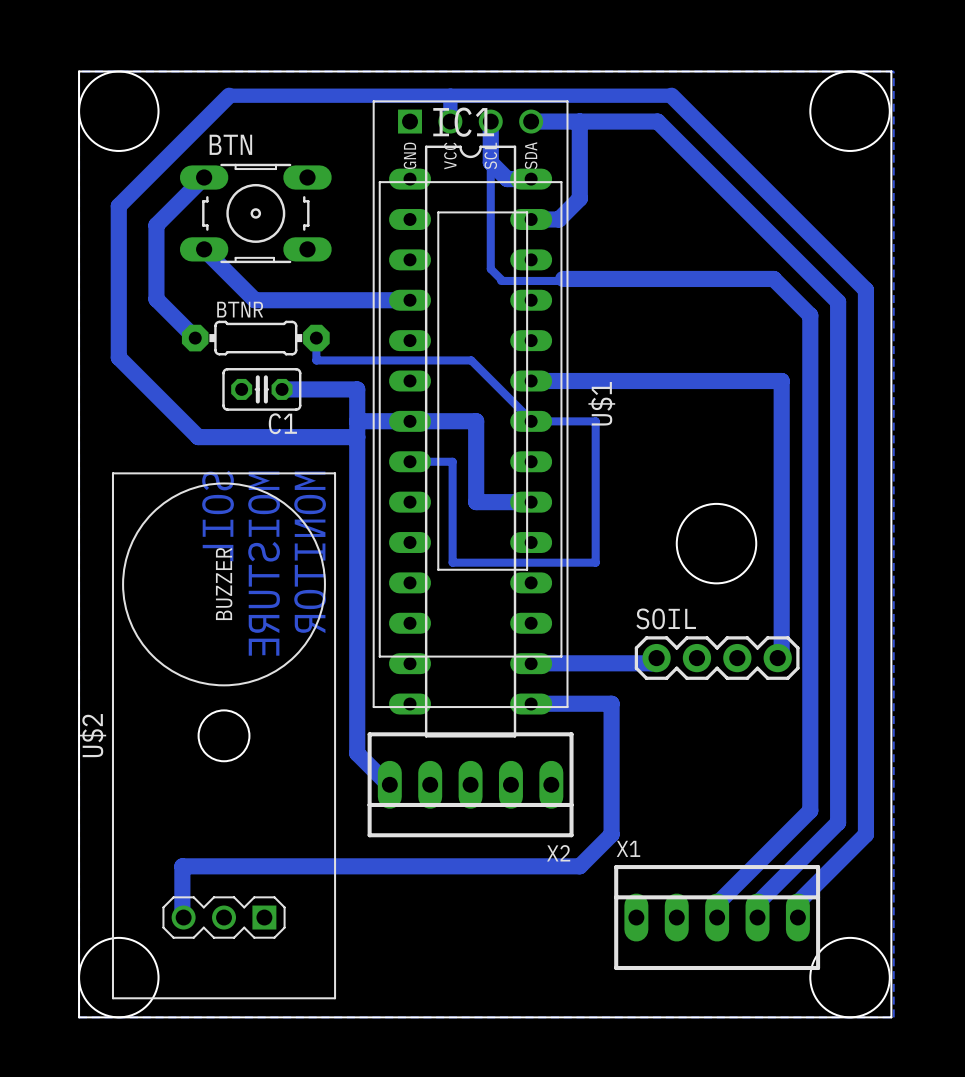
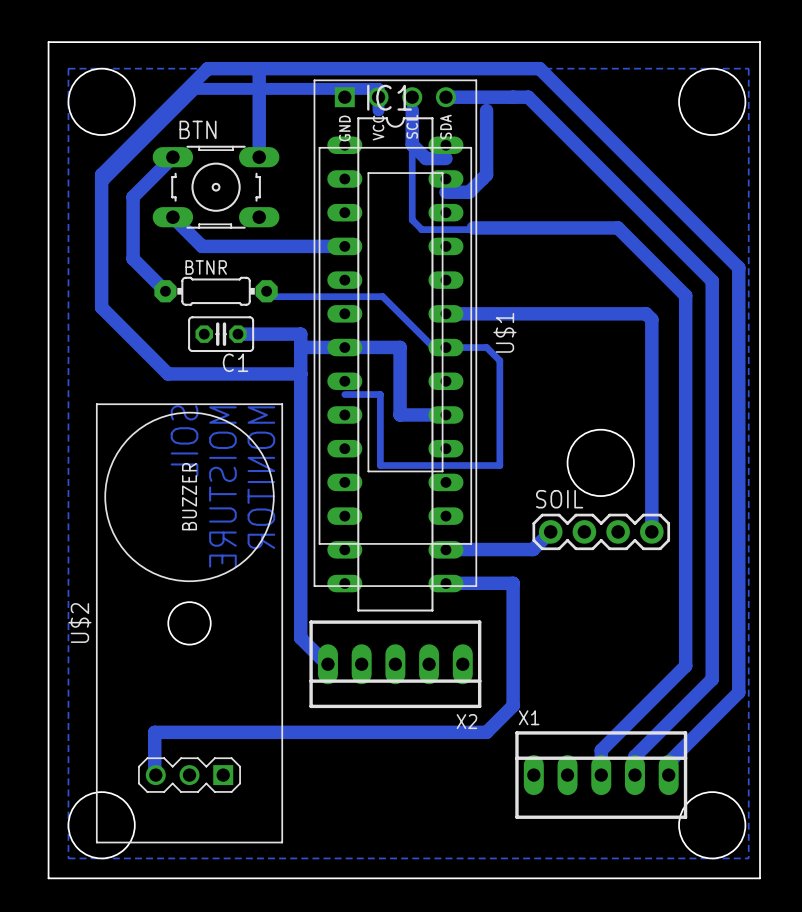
board edge: (79, 71) (891, 71) (891, 1017) (79, 1017) (79, 71) -> (48, 42) (48, 878) (760, 878) (760, 42) (48, 42)
bottom track: none -> (259, 68) (259, 157)
bottom track: (452, 95) (671, 95) (865, 290) (865, 834) -> (101, 181) (101, 174) (207, 68) (539, 68) (738, 267) (738, 692) (725, 705)
bottom track: (531, 121) (657, 121) (838, 301) (838, 822) (757, 903) -> (445, 97) (528, 97) (712, 281) (712, 679) (634, 756) (634, 763)
bottom track: (490, 252) (490, 269) (501, 280) -> (412, 219) (421, 229)
bottom track: (563, 278) (773, 278) (810, 315) (810, 810) (717, 903) -> (421, 229) (617, 227) (685, 295) (685, 665) (601, 750) (601, 763)
bottom track: (501, 280) (592, 280) -> none
bottom track: (239, 284) (254, 300) (410, 300) -> (202, 246) (344, 246)
bottom track: (316, 344) (316, 360) (471, 360) -> (266, 296) (382, 296) (396, 309)
bottom track: none -> (445, 313) (646, 313) (651, 319) (651, 531)
bottom track: (531, 381) (781, 381) (781, 654) (777, 658) -> none
U$1 position: (470, 404) -> (395, 333)
bottom track: (516, 405) (531, 421) (595, 421) -> (433, 347) (486, 347) (499, 360)
bottom track: (357, 421) (476, 421) -> (300, 347) (400, 347) (400, 360)
IC1 position: (470, 441) -> (395, 364)
bottom track: (476, 486) (476, 502) (531, 502) -> (400, 414) (445, 414)
bottom track: (452, 546) (452, 562) (595, 562) (595, 546) -> (380, 465) (499, 465)
bottom track: none -> (550, 531) (533, 549) (445, 549)
bottom track: (656, 658) (651, 663) (531, 663) -> none
SOIL position: (717, 658) -> (601, 531)
bottom track: (611, 703) (531, 704) -> (513, 596) (513, 583) (445, 583)

